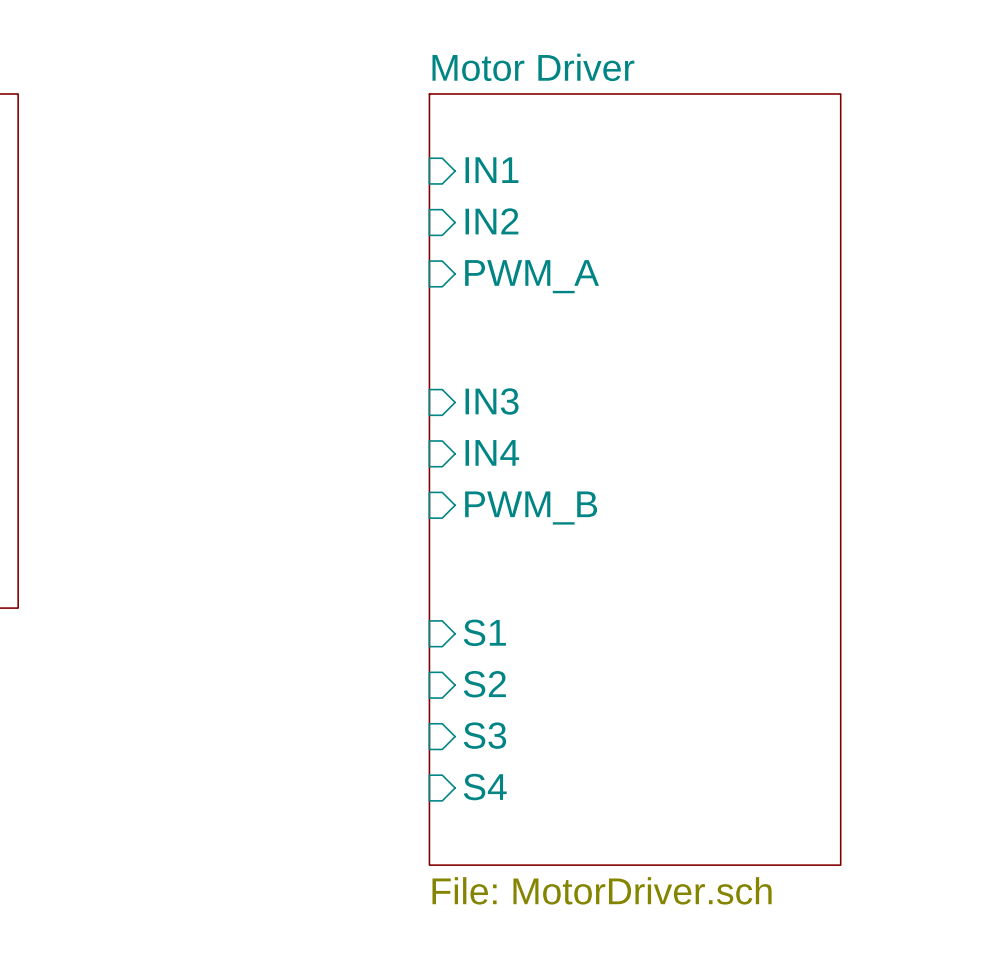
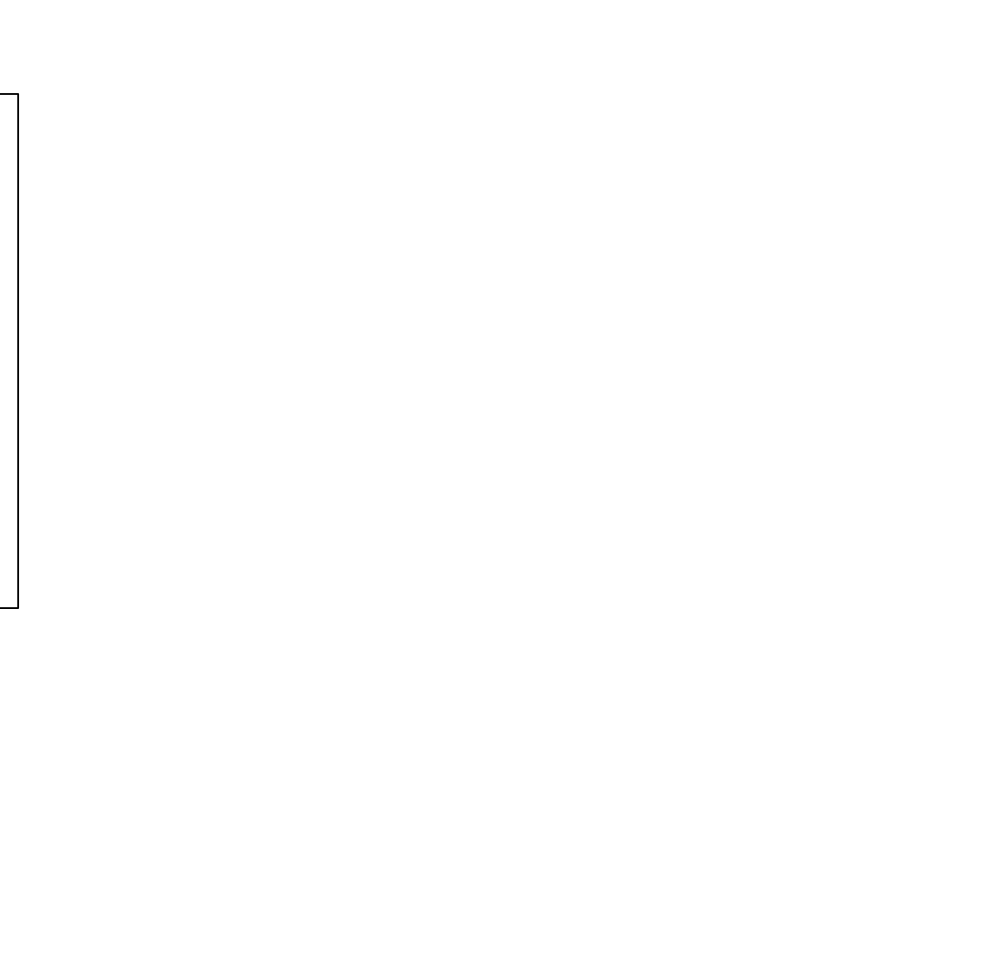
sheet pin: IN1 (491, 170) -> none
sheet pin: IN2 (491, 221) -> none
sheet pin: PWM_A (532, 276) -> none
sheet pin: IN3 (492, 401) -> none
sheet pin: IN4 (492, 452) -> none
sheet Motor Driver: File: MotorDriver.sch (635, 479) -> none
sheet pin: PWM_B (531, 508) -> none
sheet pin: S1 (484, 632) -> none
sheet pin: S2 (484, 684) -> none
sheet pin: S3 (484, 735) -> none
sheet pin: S4 (485, 787) -> none

